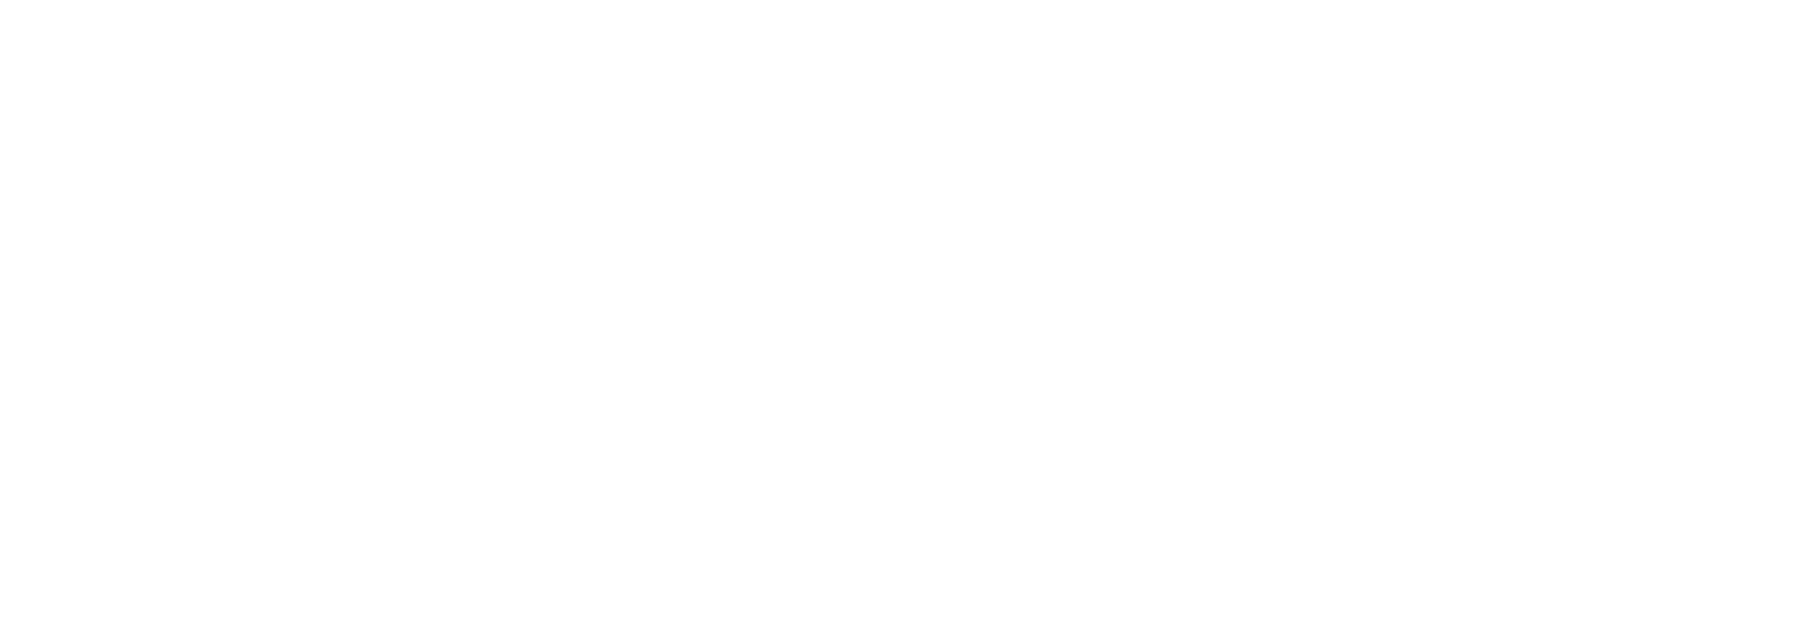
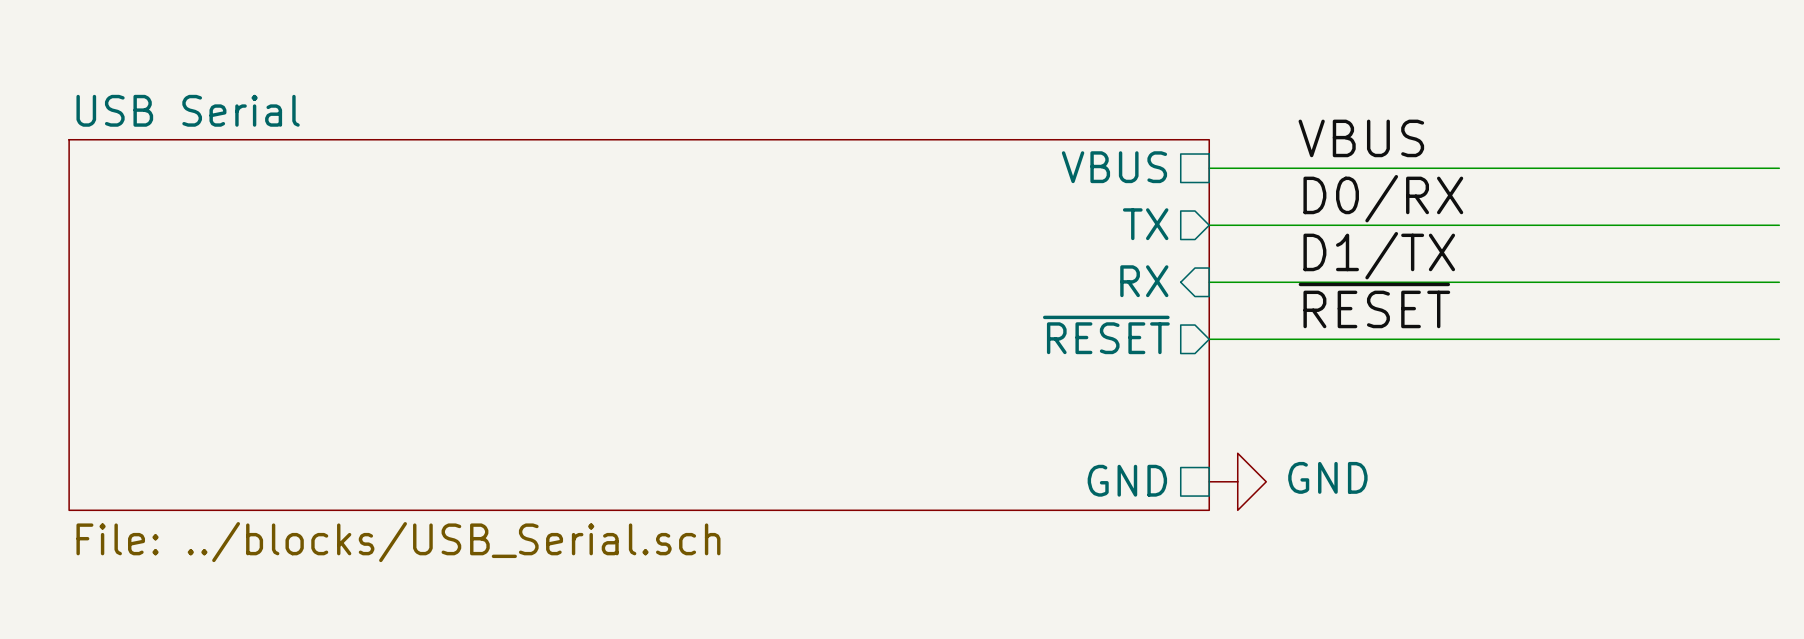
label: none -> VBUS (1361, 138)
sheet pin: none -> VBUS (1114, 167)
wire: none -> (1209, 168) (1779, 168)
label: none -> D0/RX (1383, 198)
sheet pin: none -> TX (1145, 224)
wire: none -> (1209, 225) (1779, 225)
label: none -> D1/TX (1379, 255)
sheet pin: none -> RX (1144, 281)
wire: none -> (1209, 282) (1779, 282)
label: none -> ~{RESET} (1374, 305)
sheet USB Serial: none -> File: ../blocks/USB_Serial.sch (639, 325)
sheet pin: none -> ~{RESET} (1106, 334)
wire: none -> (1209, 339) (1779, 339)
sheet pin: none -> GND (1127, 480)
power symbol: none -> GND (1237, 481)

